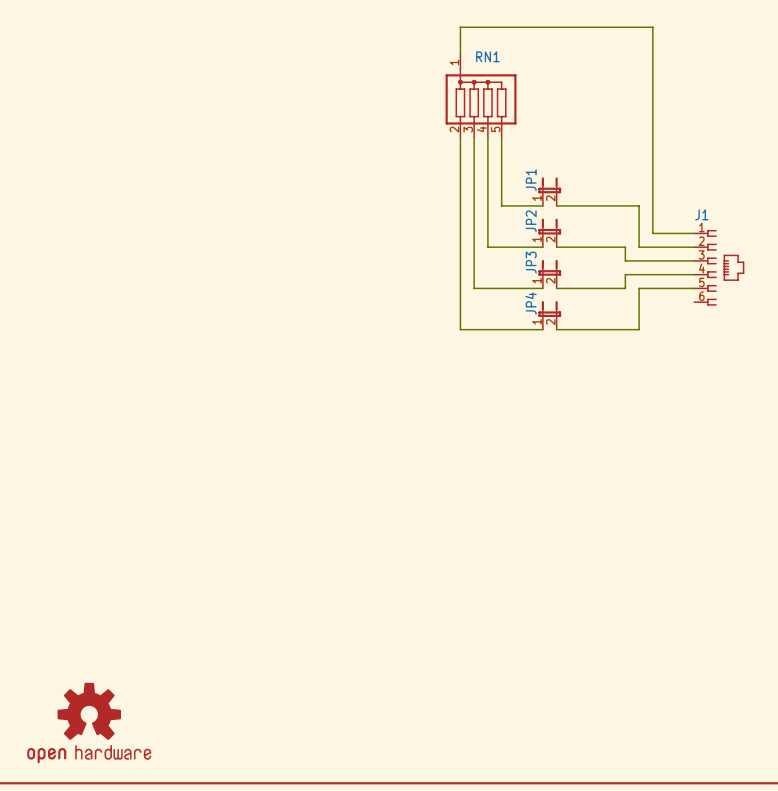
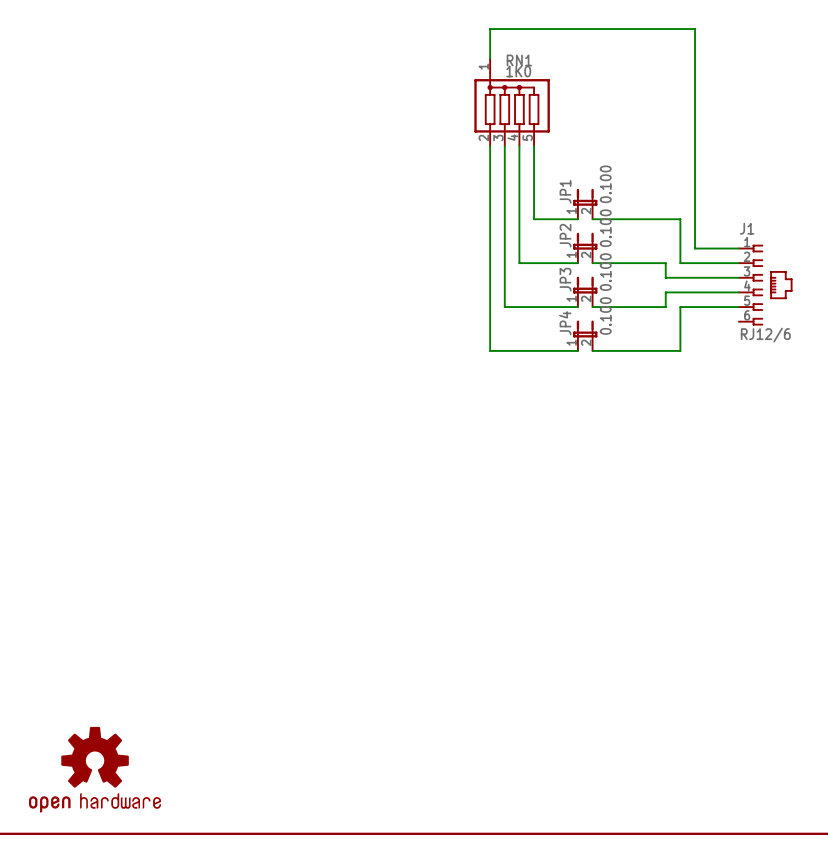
RN1 value: none -> 1K0 (518, 71)
JP1 value: none -> 0.100 (605, 184)
JP2 value: none -> 0.100 (605, 228)
JP3 value: none -> 0.100 (605, 272)
JP4 value: none -> 0.100 (605, 316)
J1 value: none -> RJ12/6 (765, 335)

